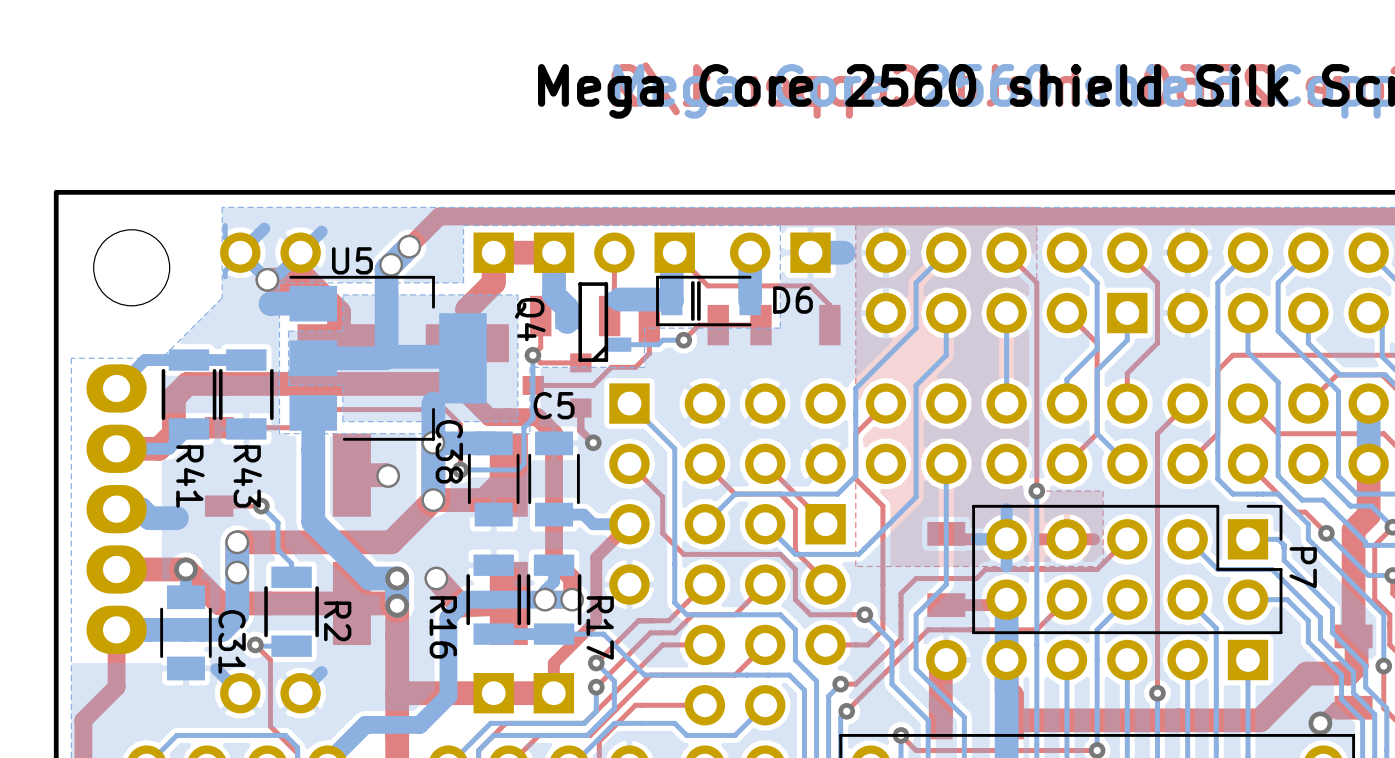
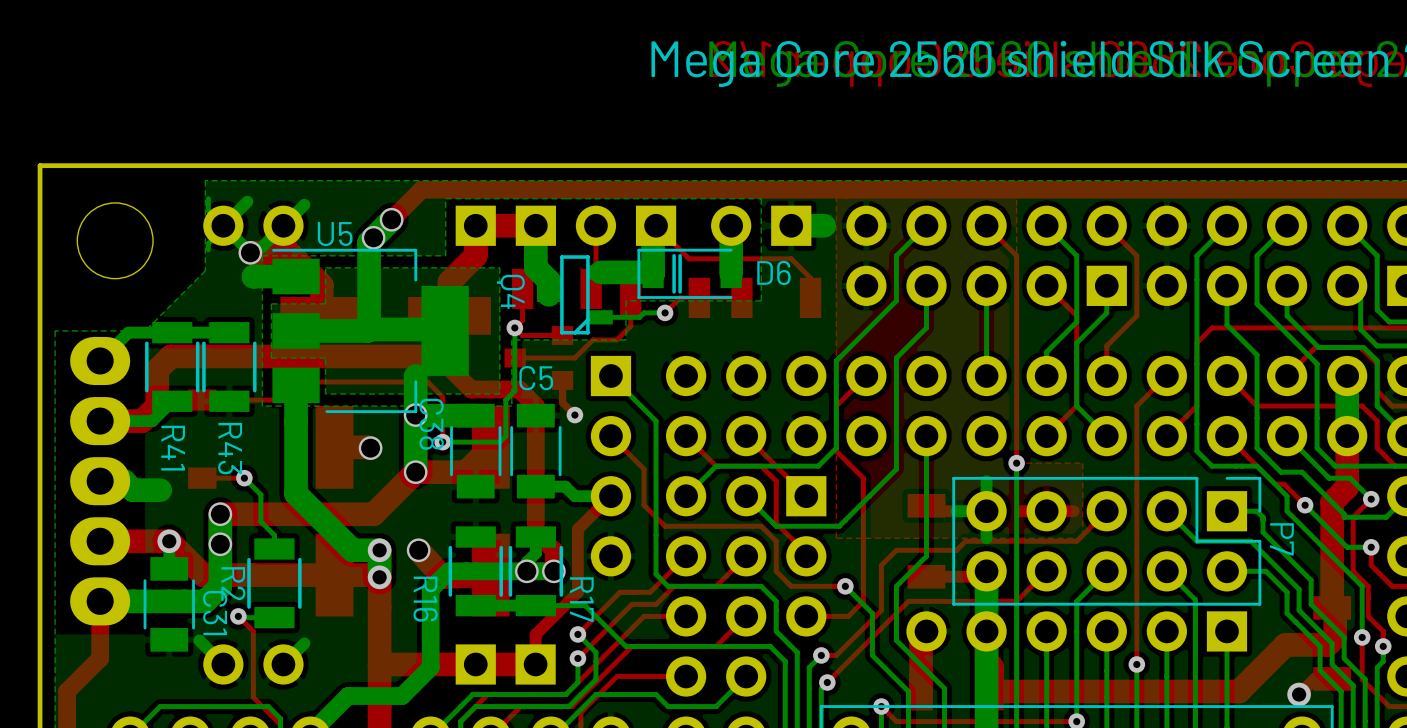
R2 name position: R2 (337, 621) -> R2 (233, 583)

